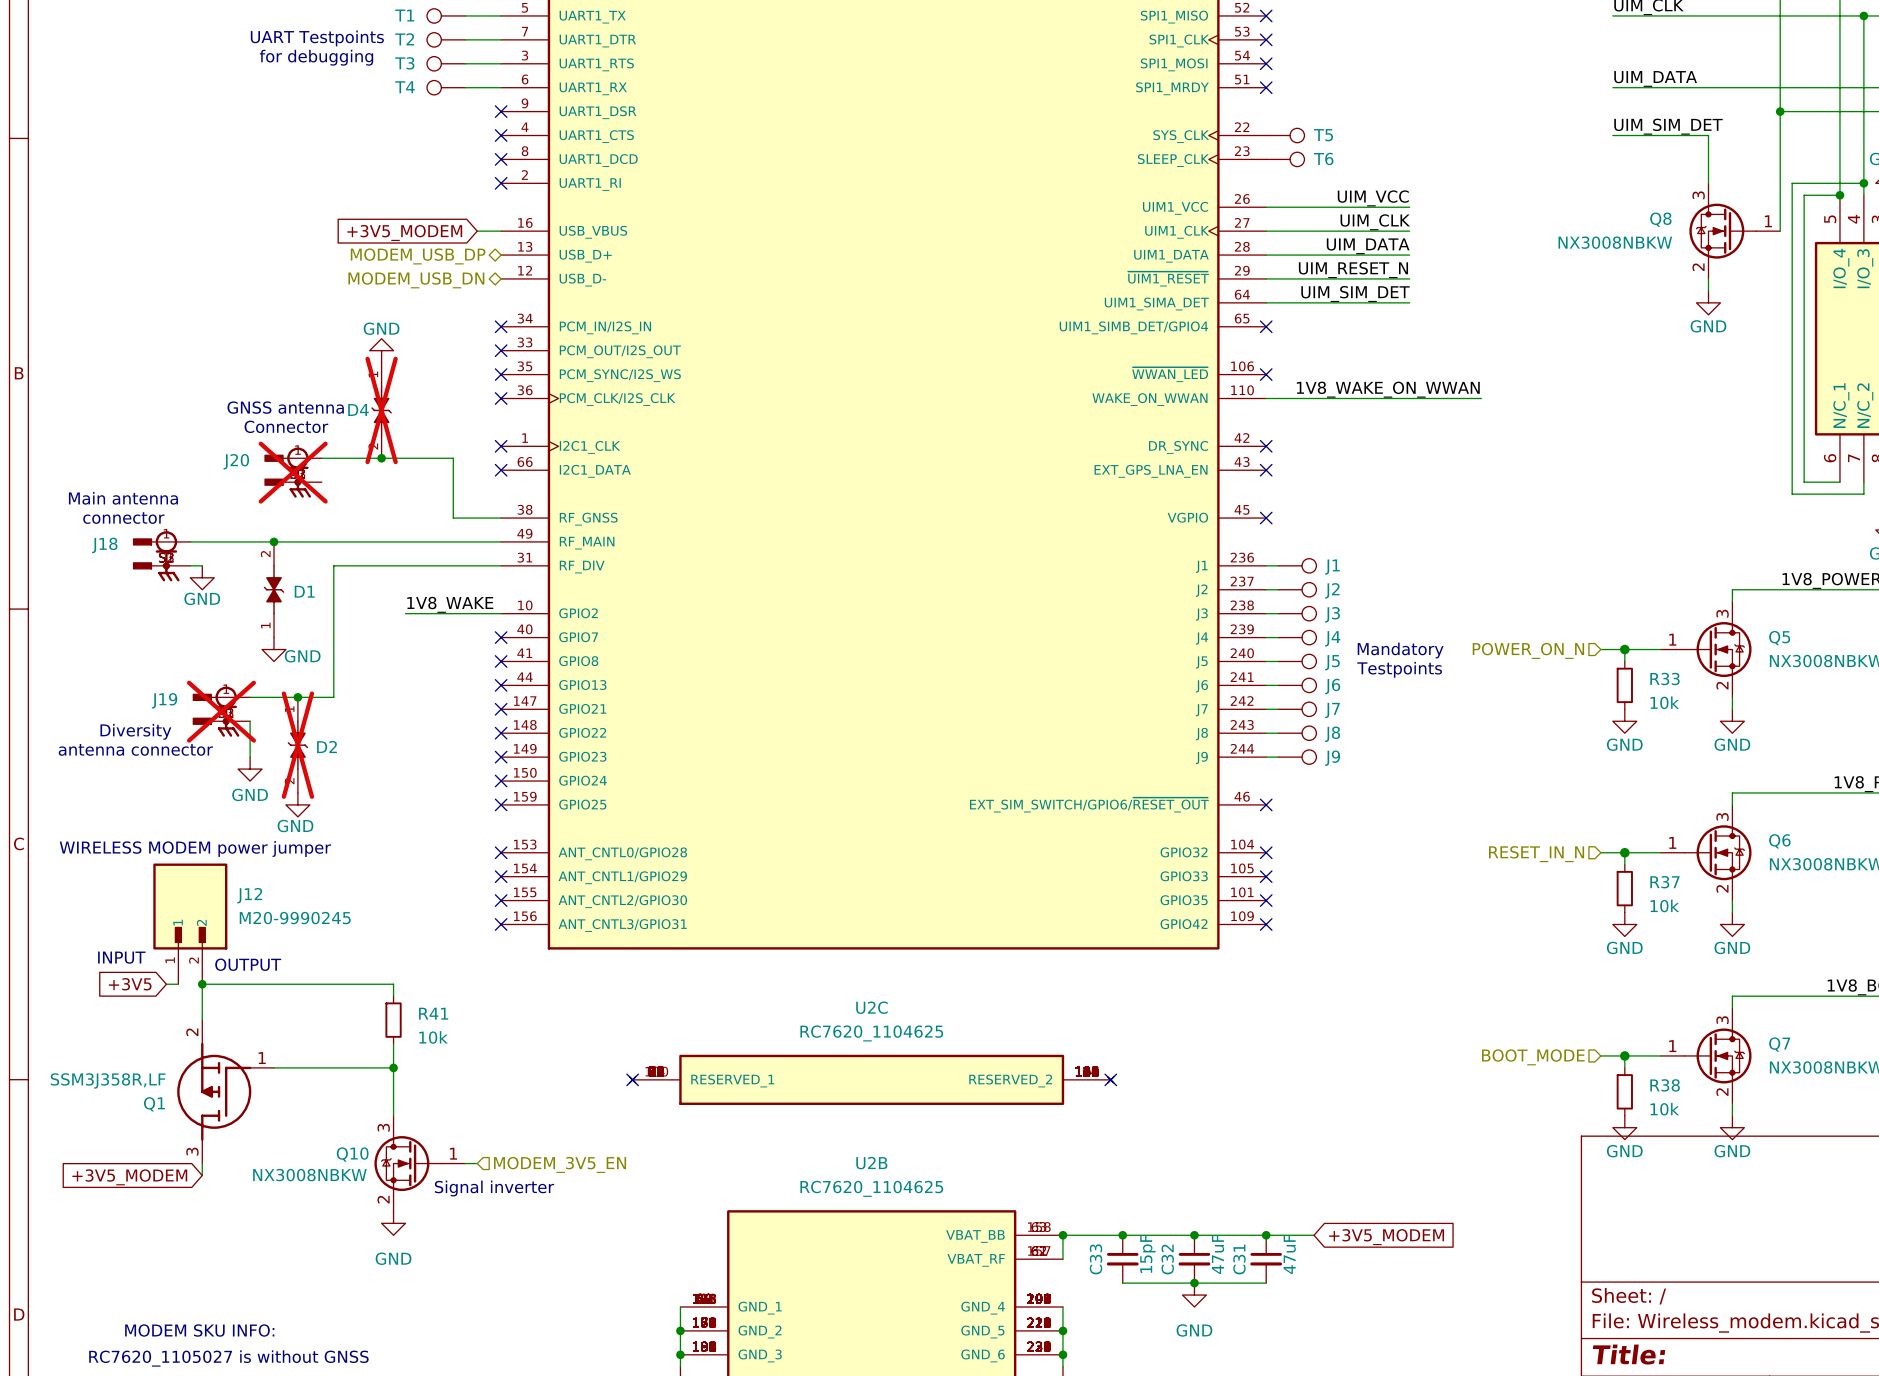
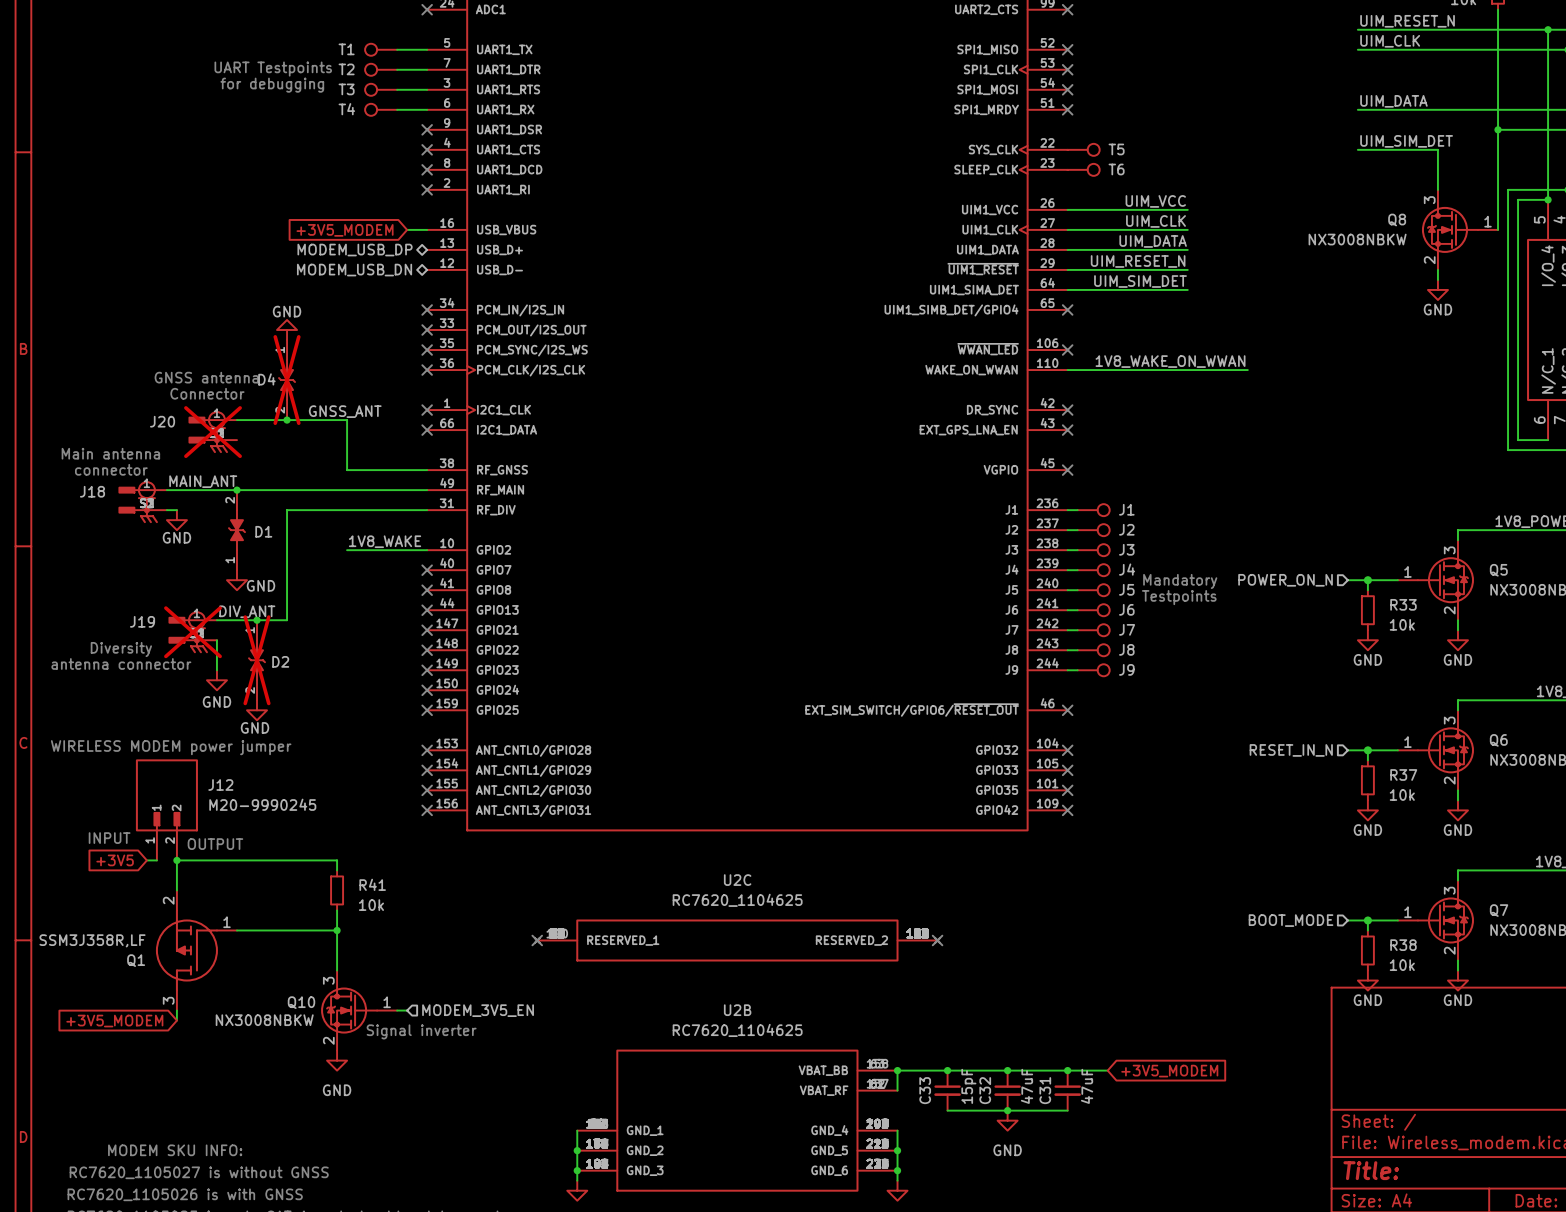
power symbol position: GND (381, 350) -> GND (287, 329)
text position: GNSS antenna (285, 407) -> GNSS antenna (206, 377)
D4 position: (381, 410) -> (287, 380)
text position: Connector (286, 426) -> Connector (207, 393)
label: none -> GNSS_ANT (345, 411)
junction position: (381, 458) -> (287, 420)
wire: (405, 458) (453, 458) (453, 518) -> (347, 420) (347, 470) (387, 470)
J20 position: (293, 472) -> (213, 432)
label: none -> MAIN_ANT (203, 481)
label: none -> DIV_ANT (247, 611)

